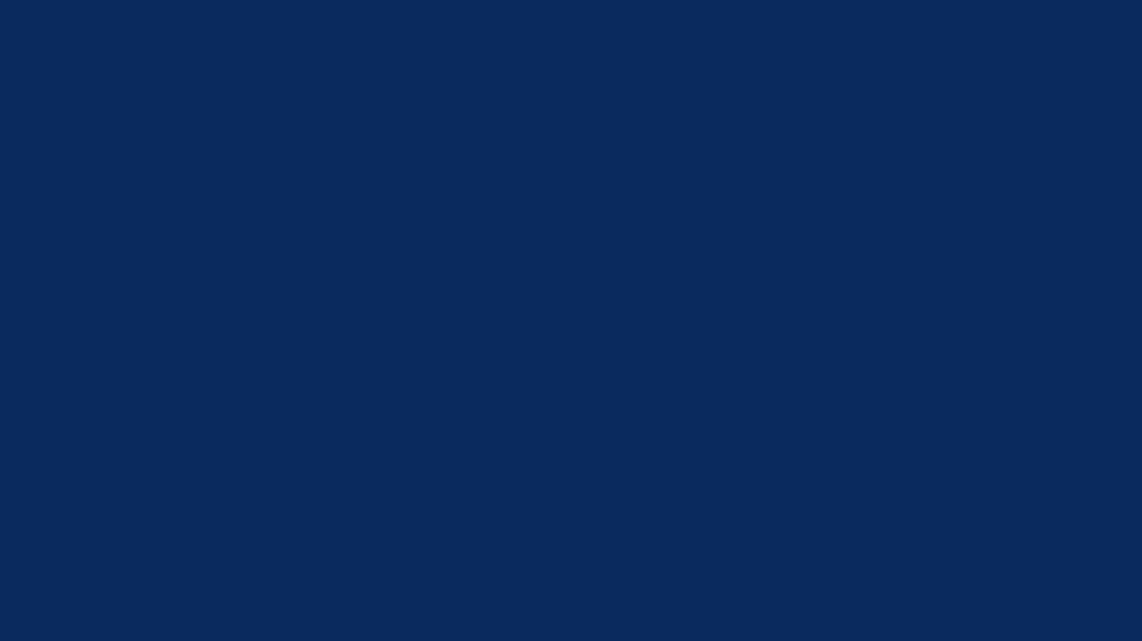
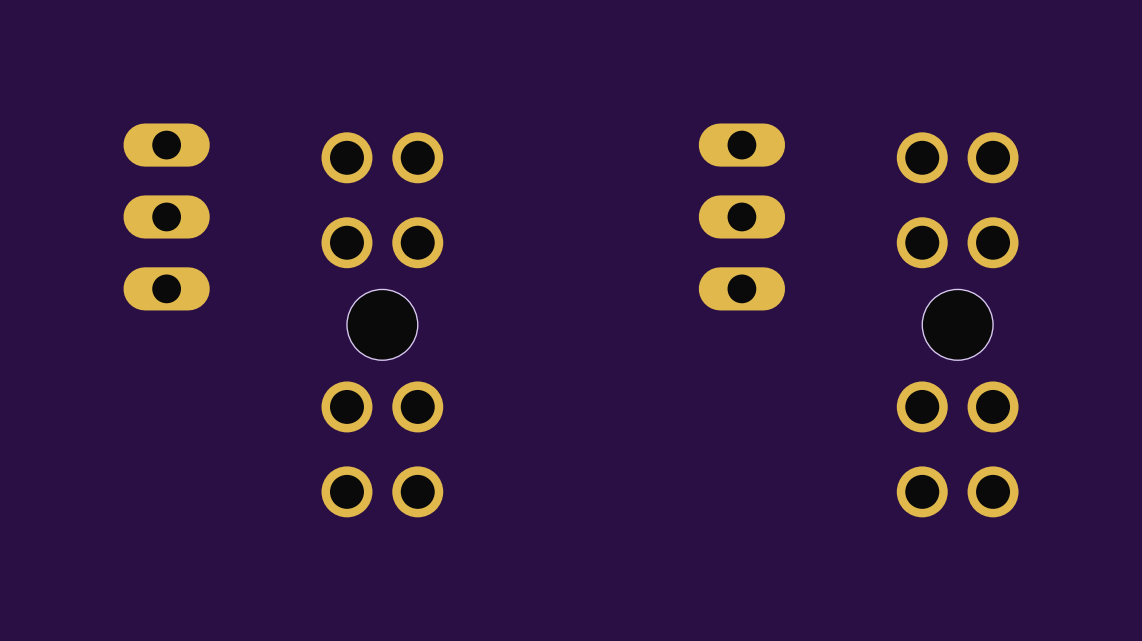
part: none -> (166, 216)
part: none -> (741, 216)
part: none -> (382, 324)
part: none -> (957, 324)

